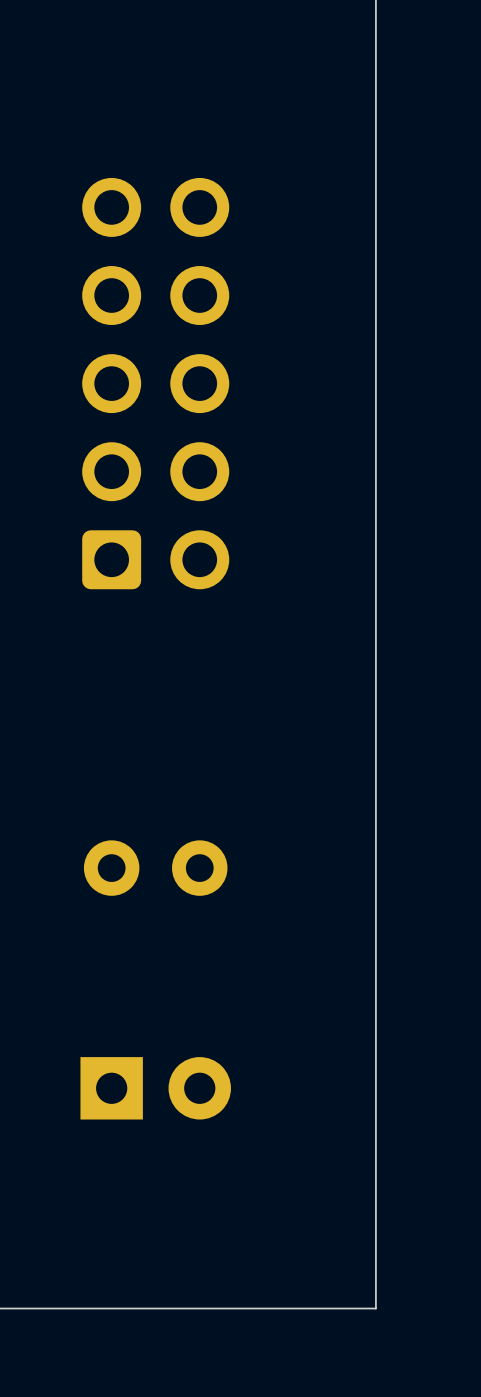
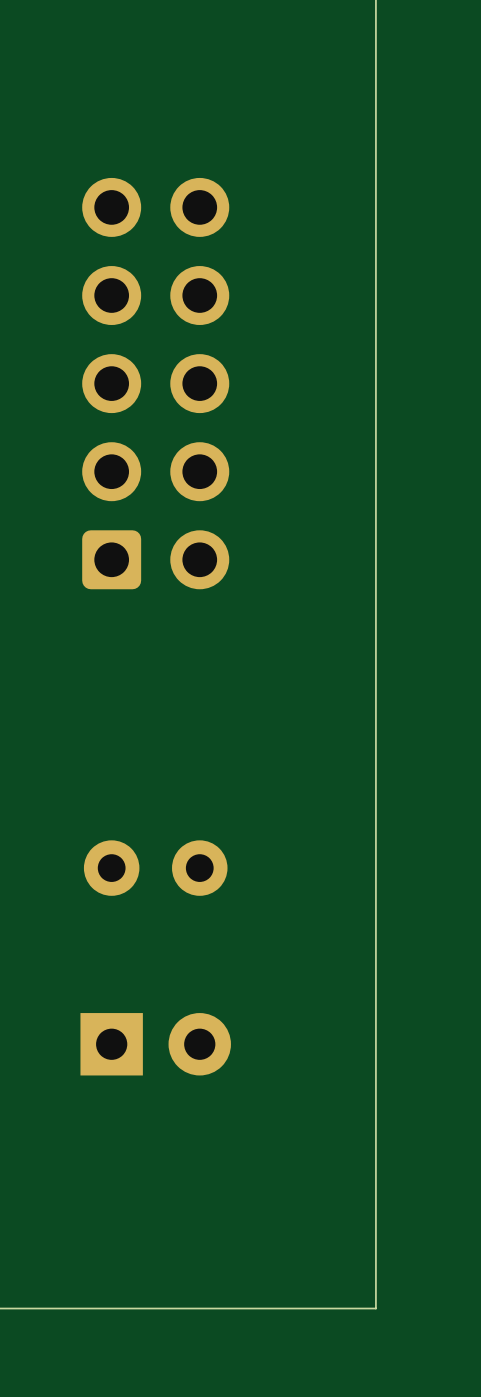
part position: (155, 1088) -> (155, 1044)

